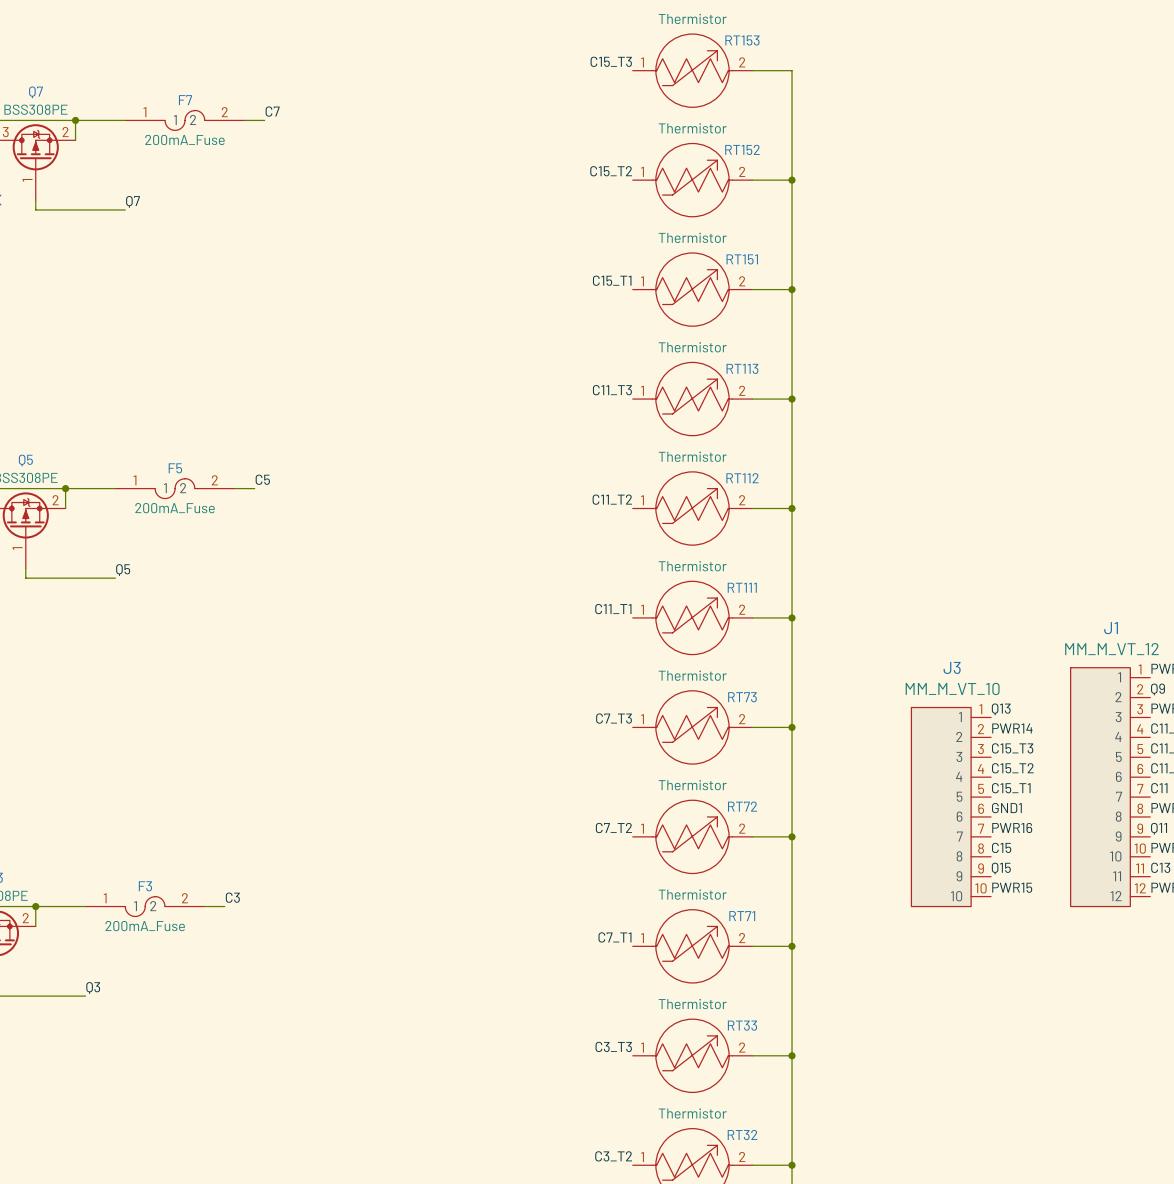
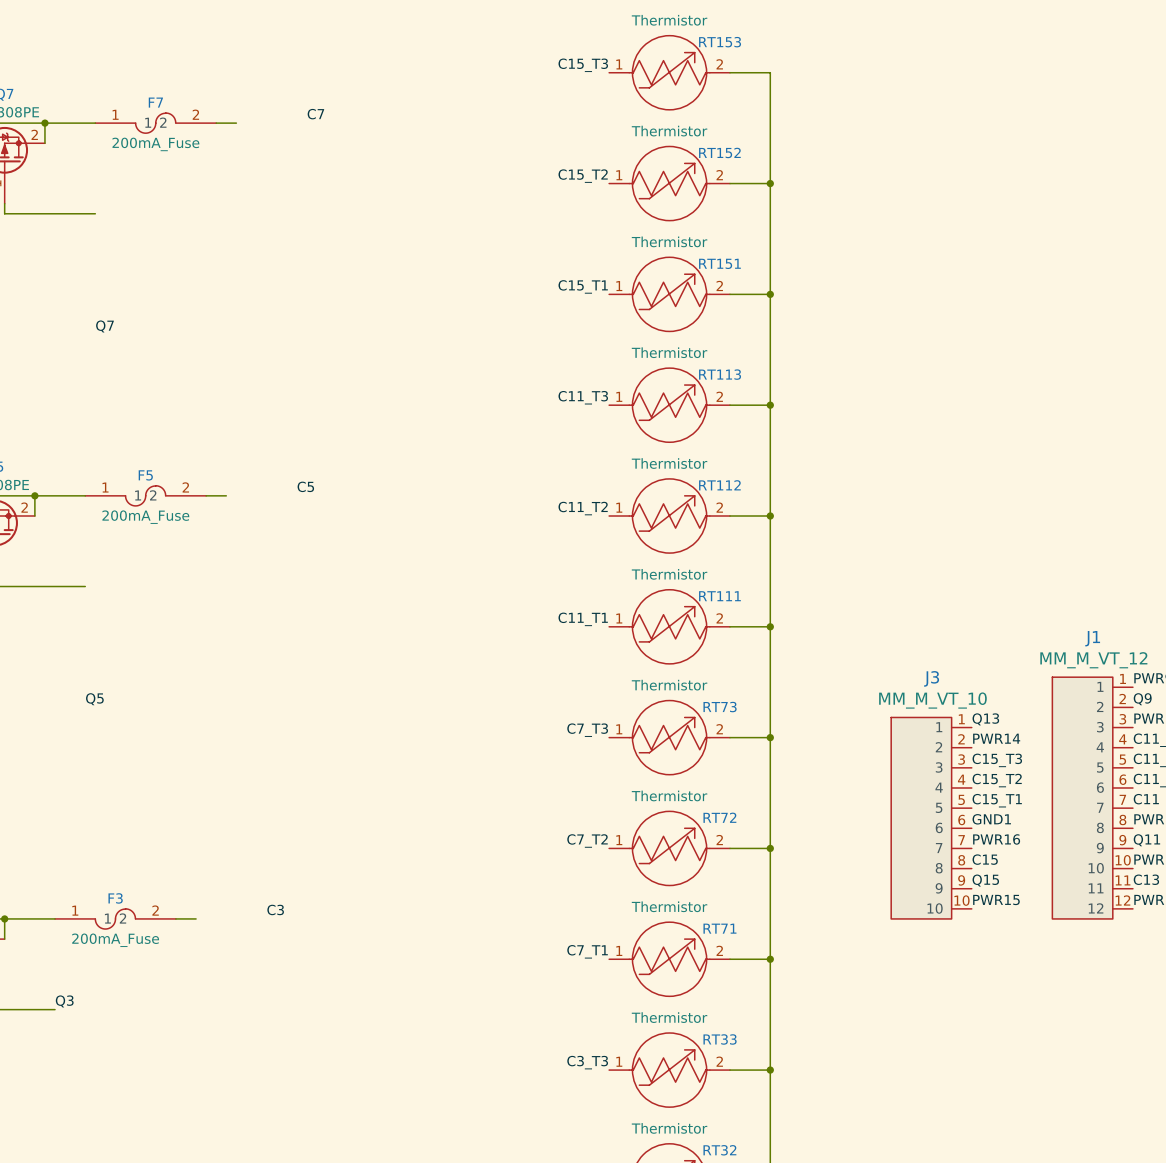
label position: C7 (272, 111) -> C7 (315, 114)
label position: Q7 (133, 201) -> Q7 (104, 326)
label position: C5 (262, 479) -> C5 (305, 486)
label position: Q5 (123, 570) -> Q5 (94, 699)
label position: C3 (232, 897) -> C3 (275, 909)

